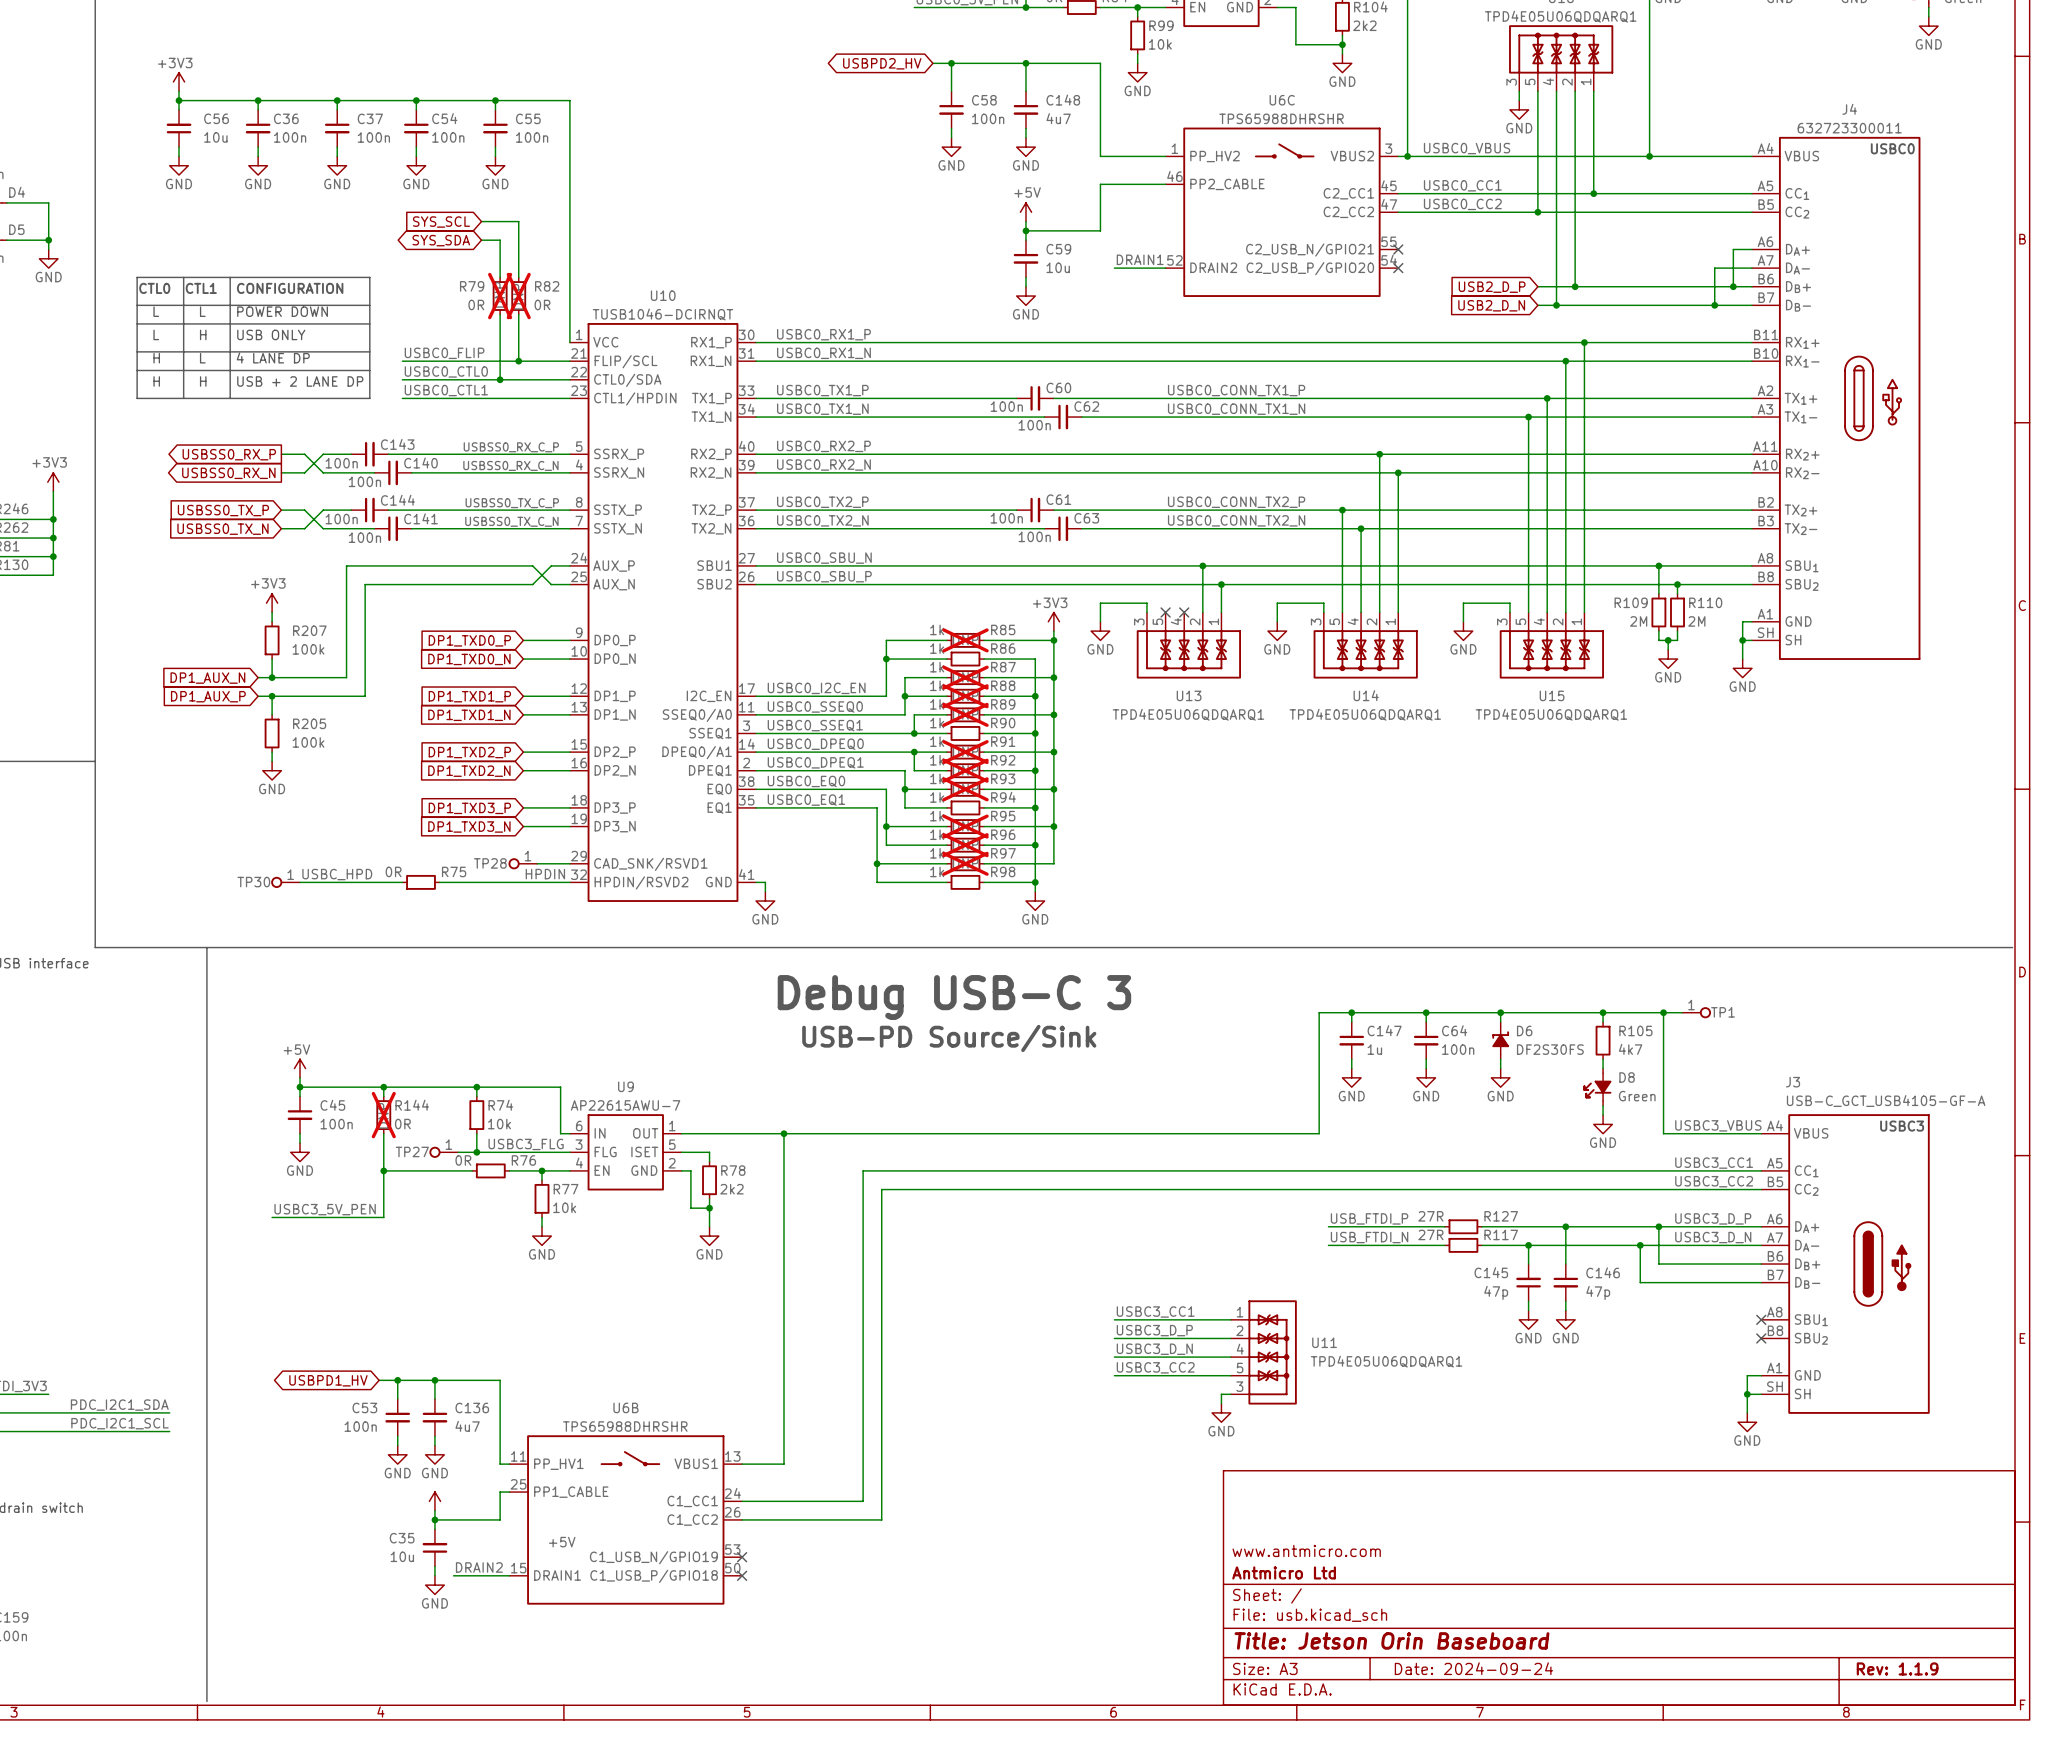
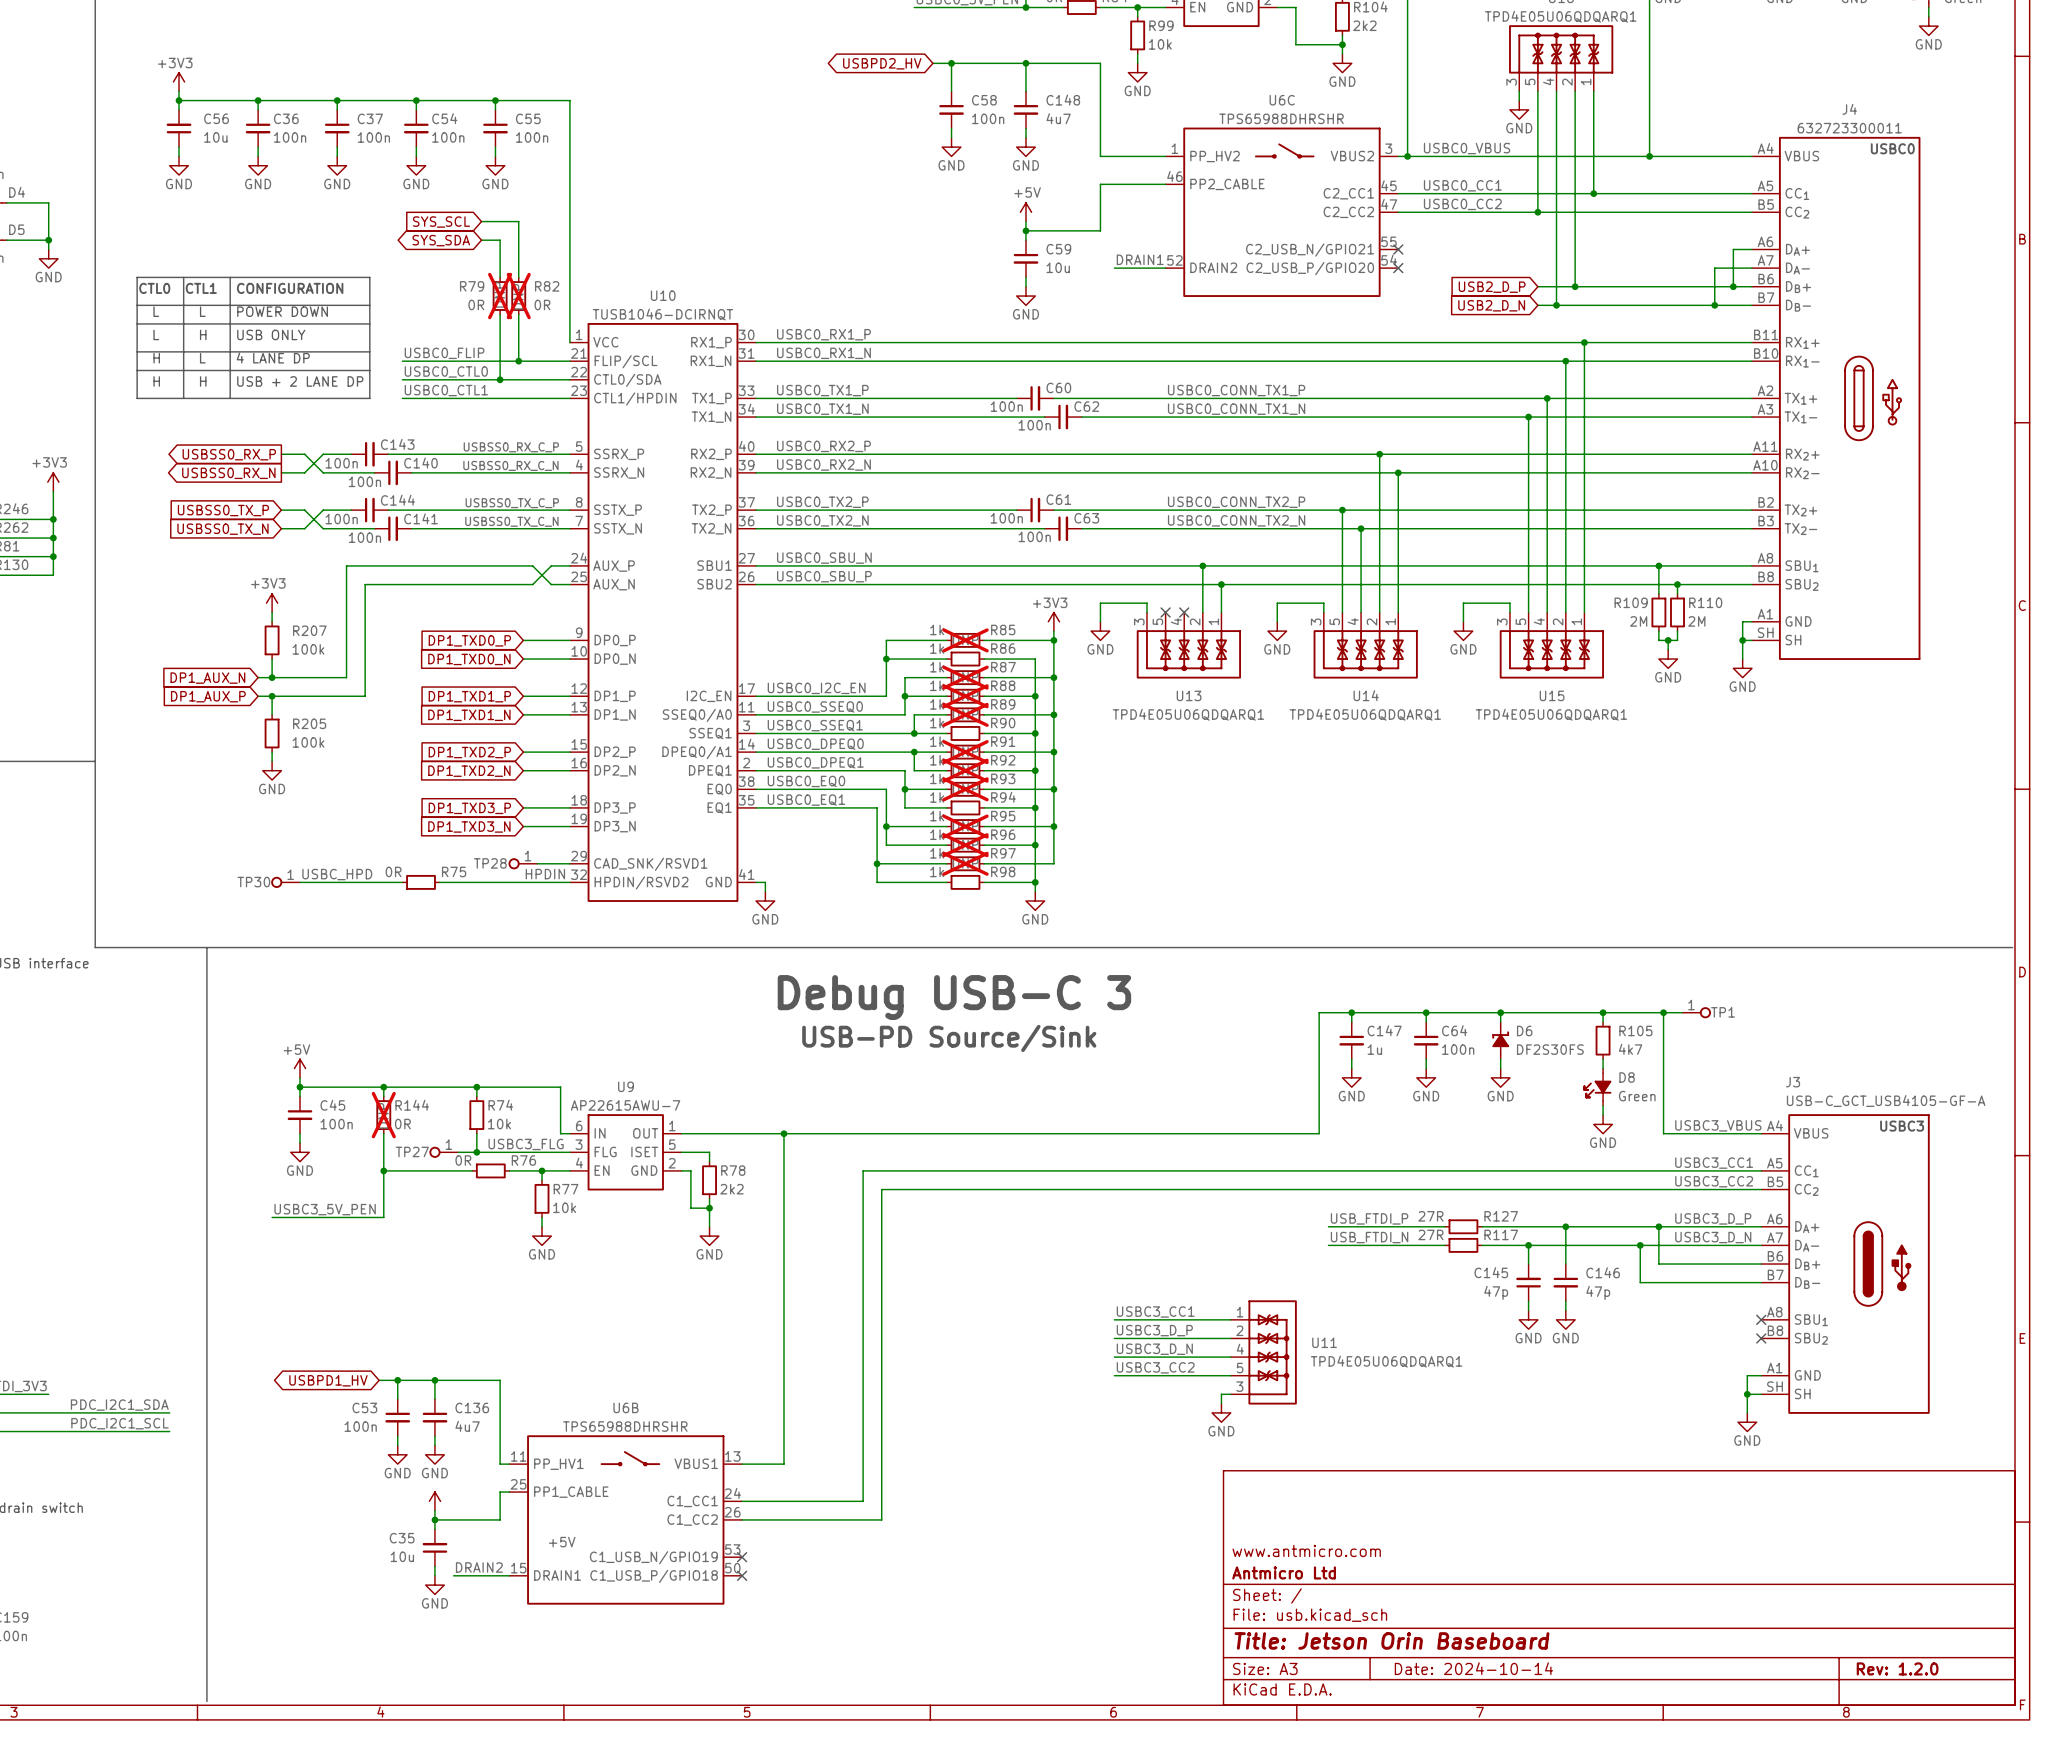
title block: Date: 2024-09-24 (1473, 1668) -> Date: 2024-10-14 (1473, 1668)
title block: Rev: 1.1.9 (1897, 1668) -> Rev: 1.2.0 (1897, 1668)

